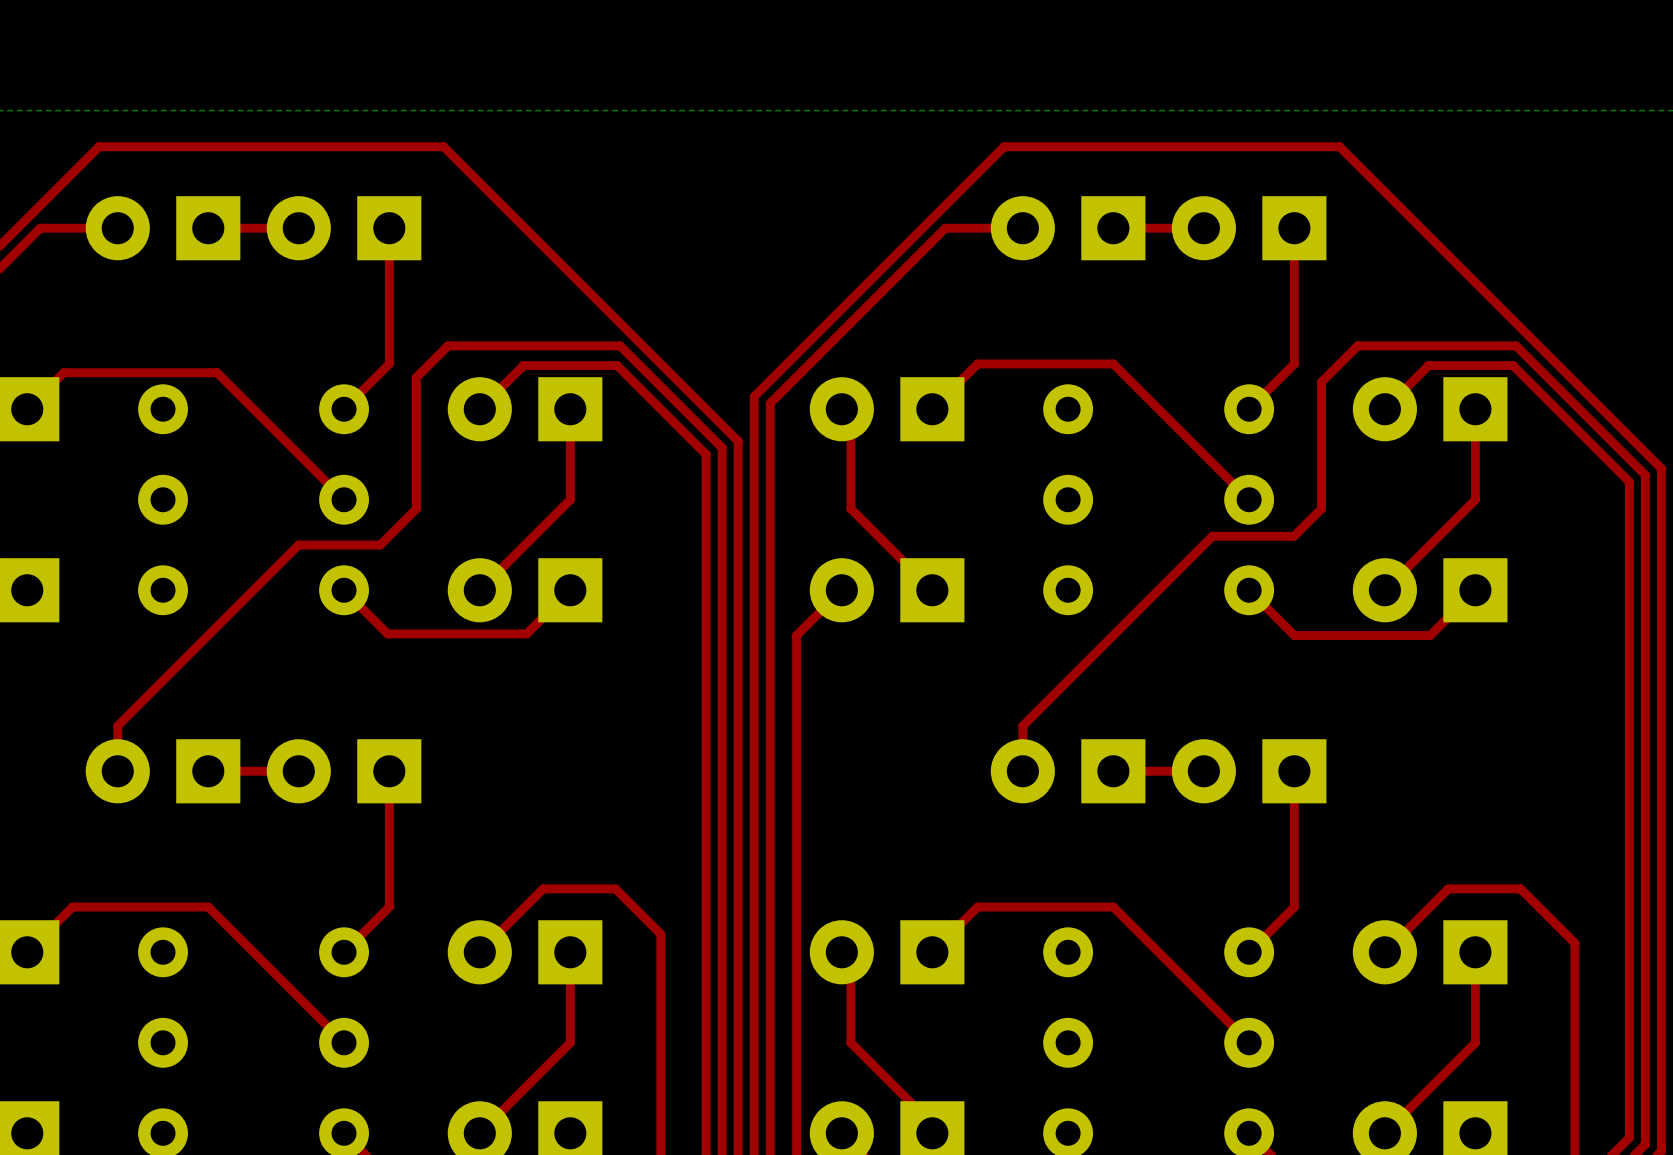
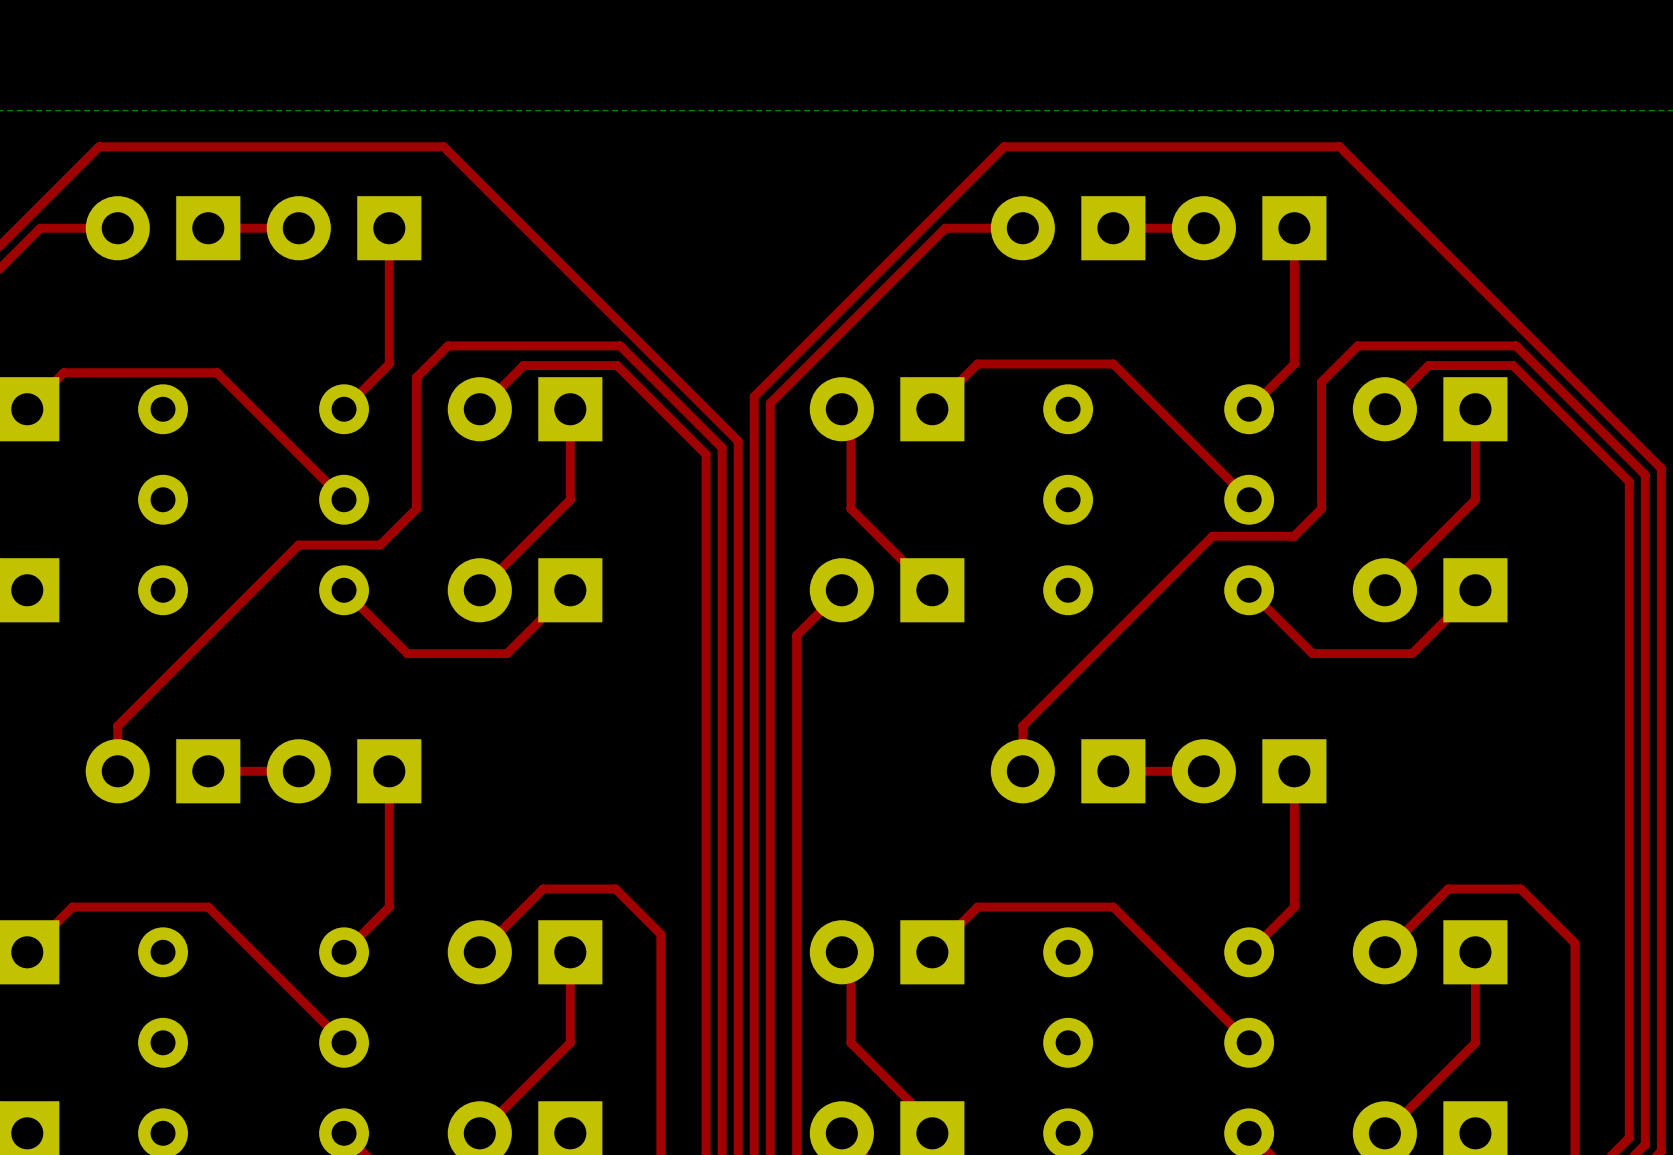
top track: (526, 633) (387, 633) -> (526, 633) (506, 653) (407, 653) (387, 633)
top track: (1430, 635) (1294, 635) -> (1430, 635) (1412, 653) (1312, 653) (1294, 635)

